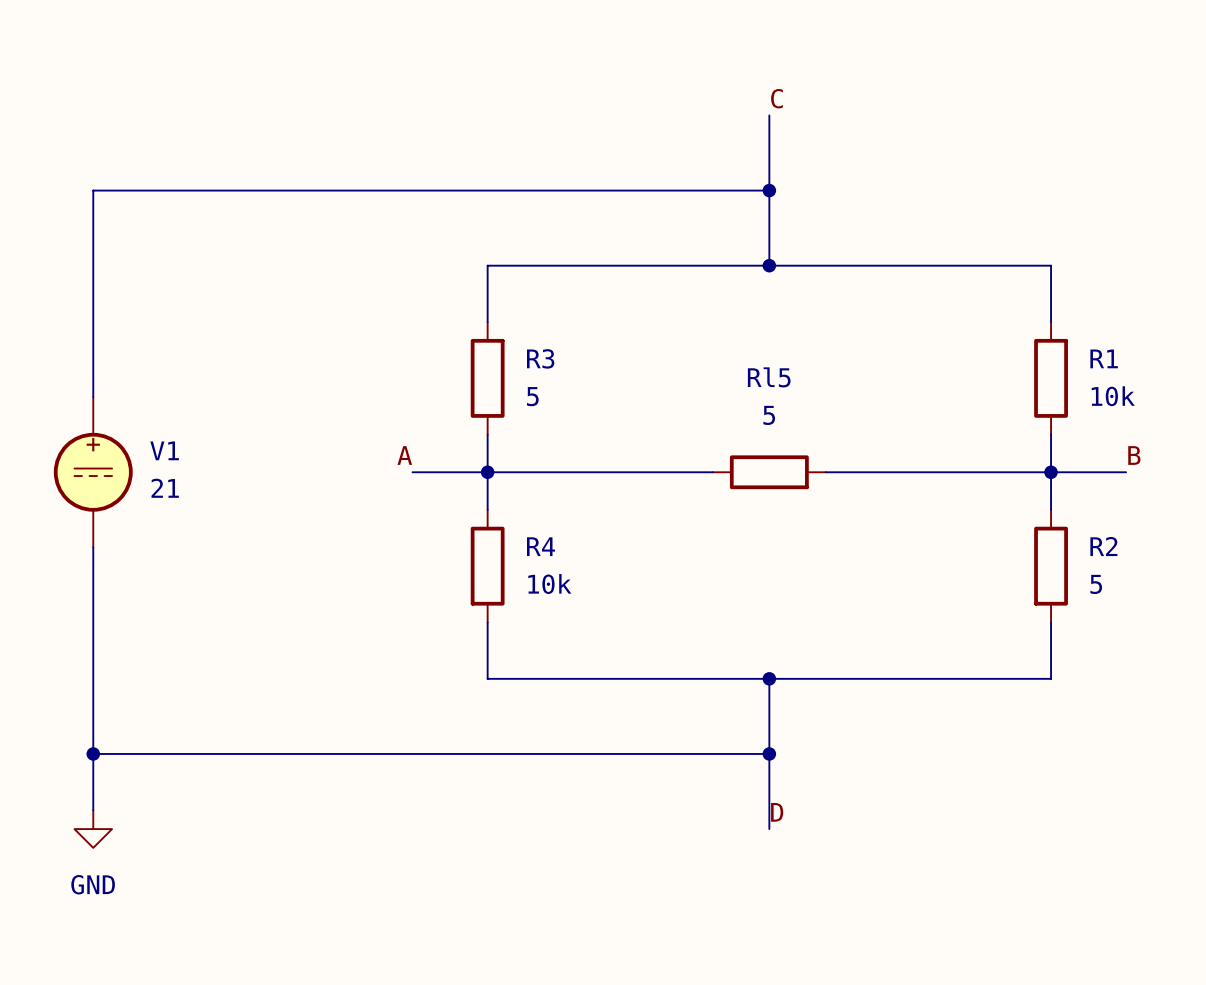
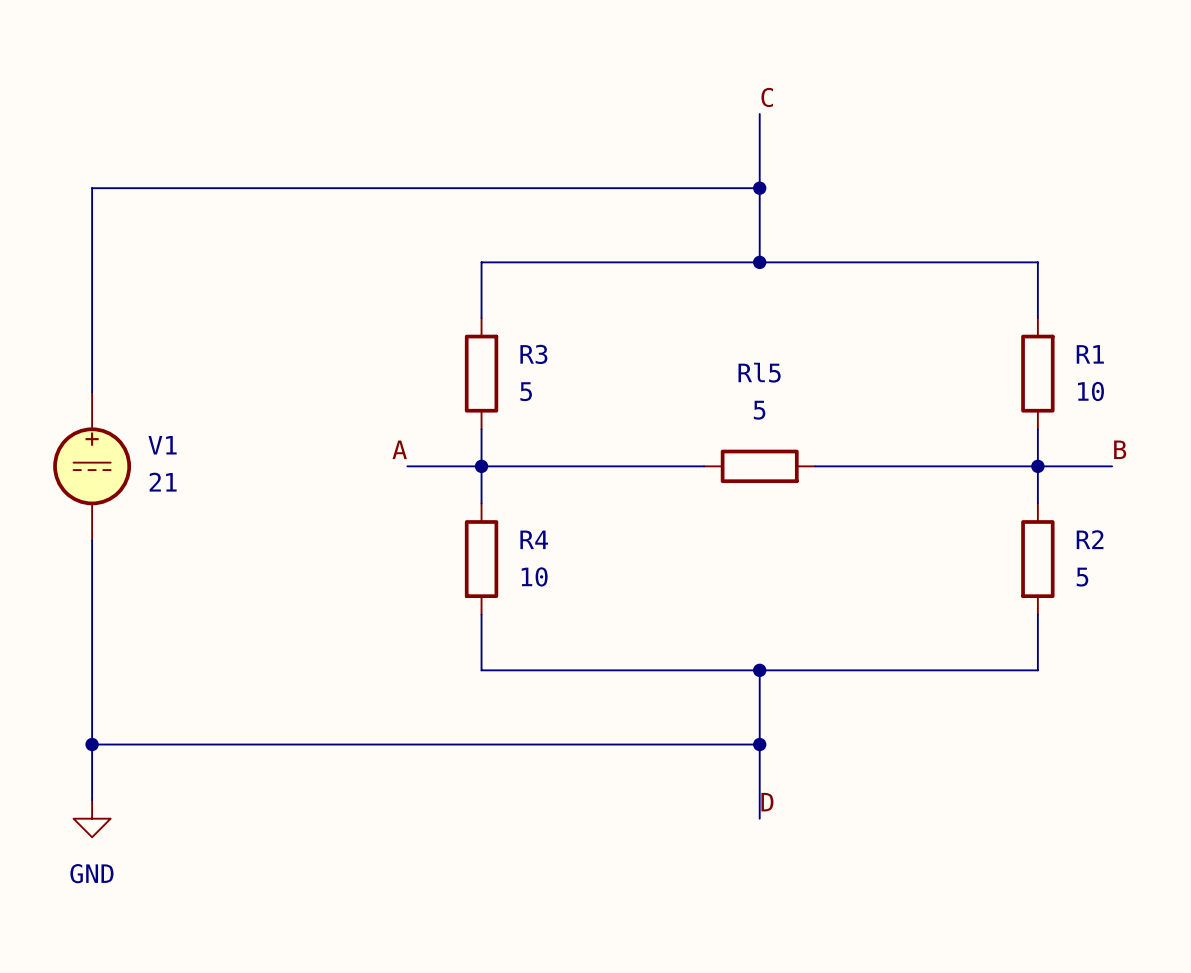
R1 value: 10k (1113, 396) -> 10 (1090, 391)
R4 value: 10k (549, 584) -> 10 (534, 576)

